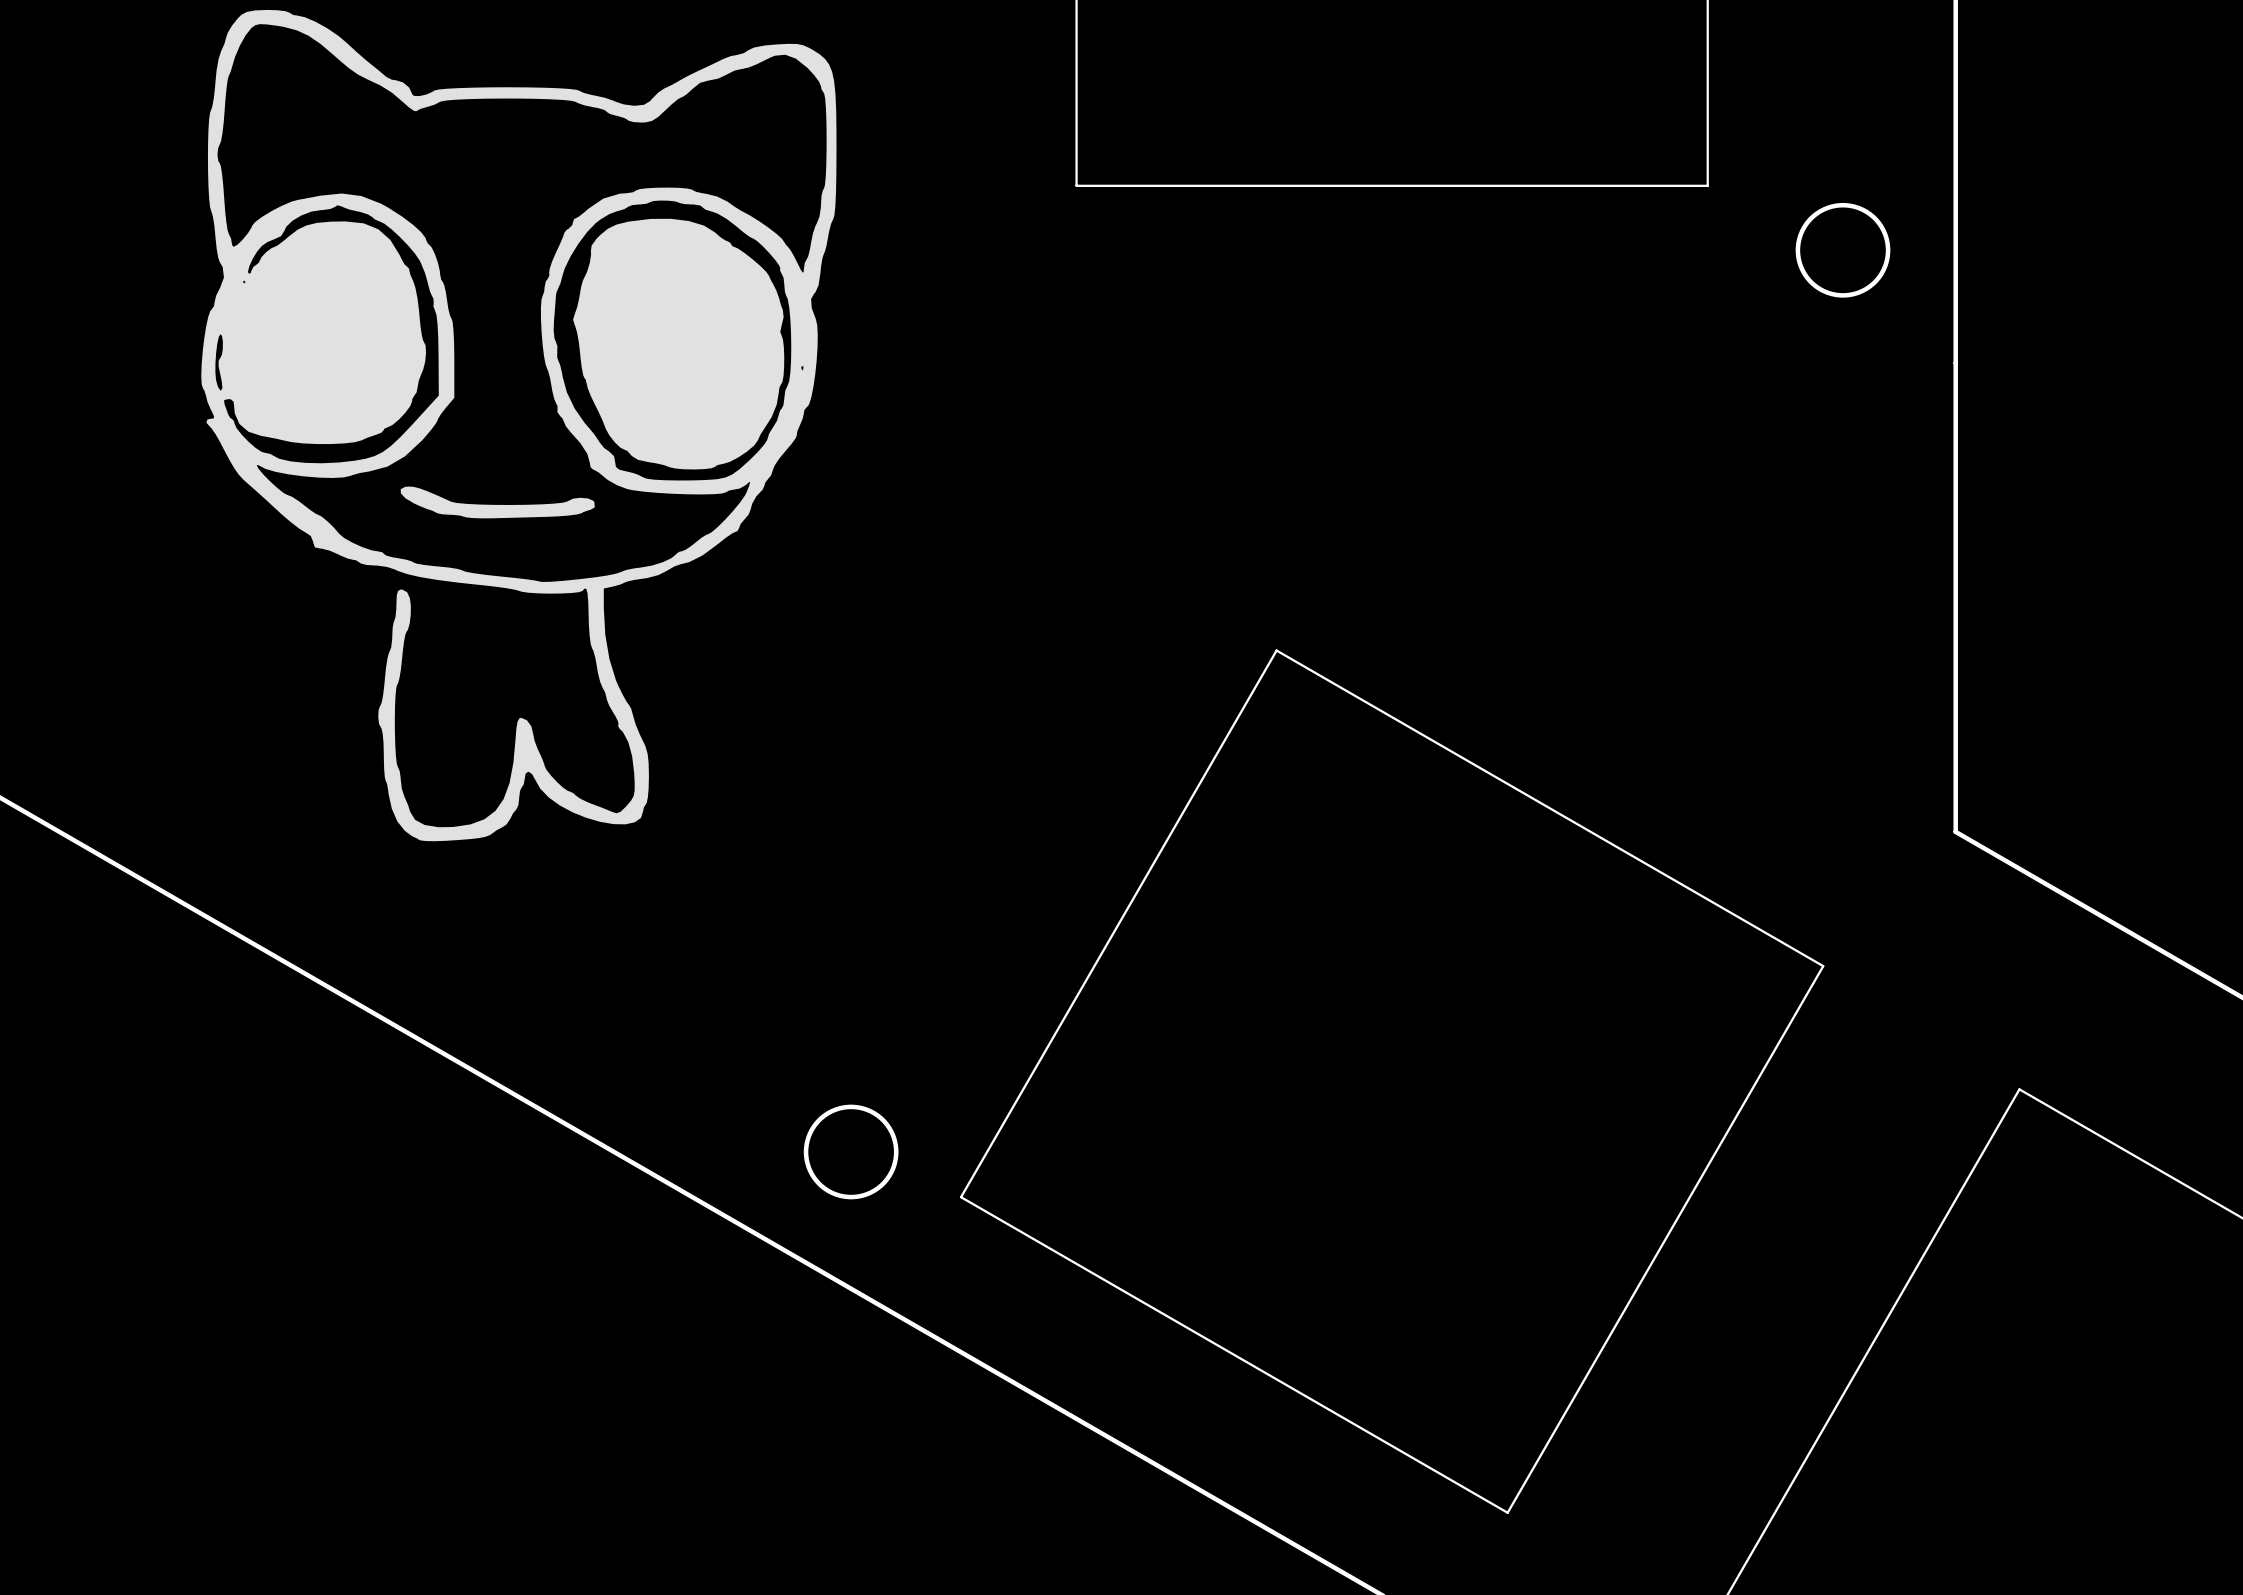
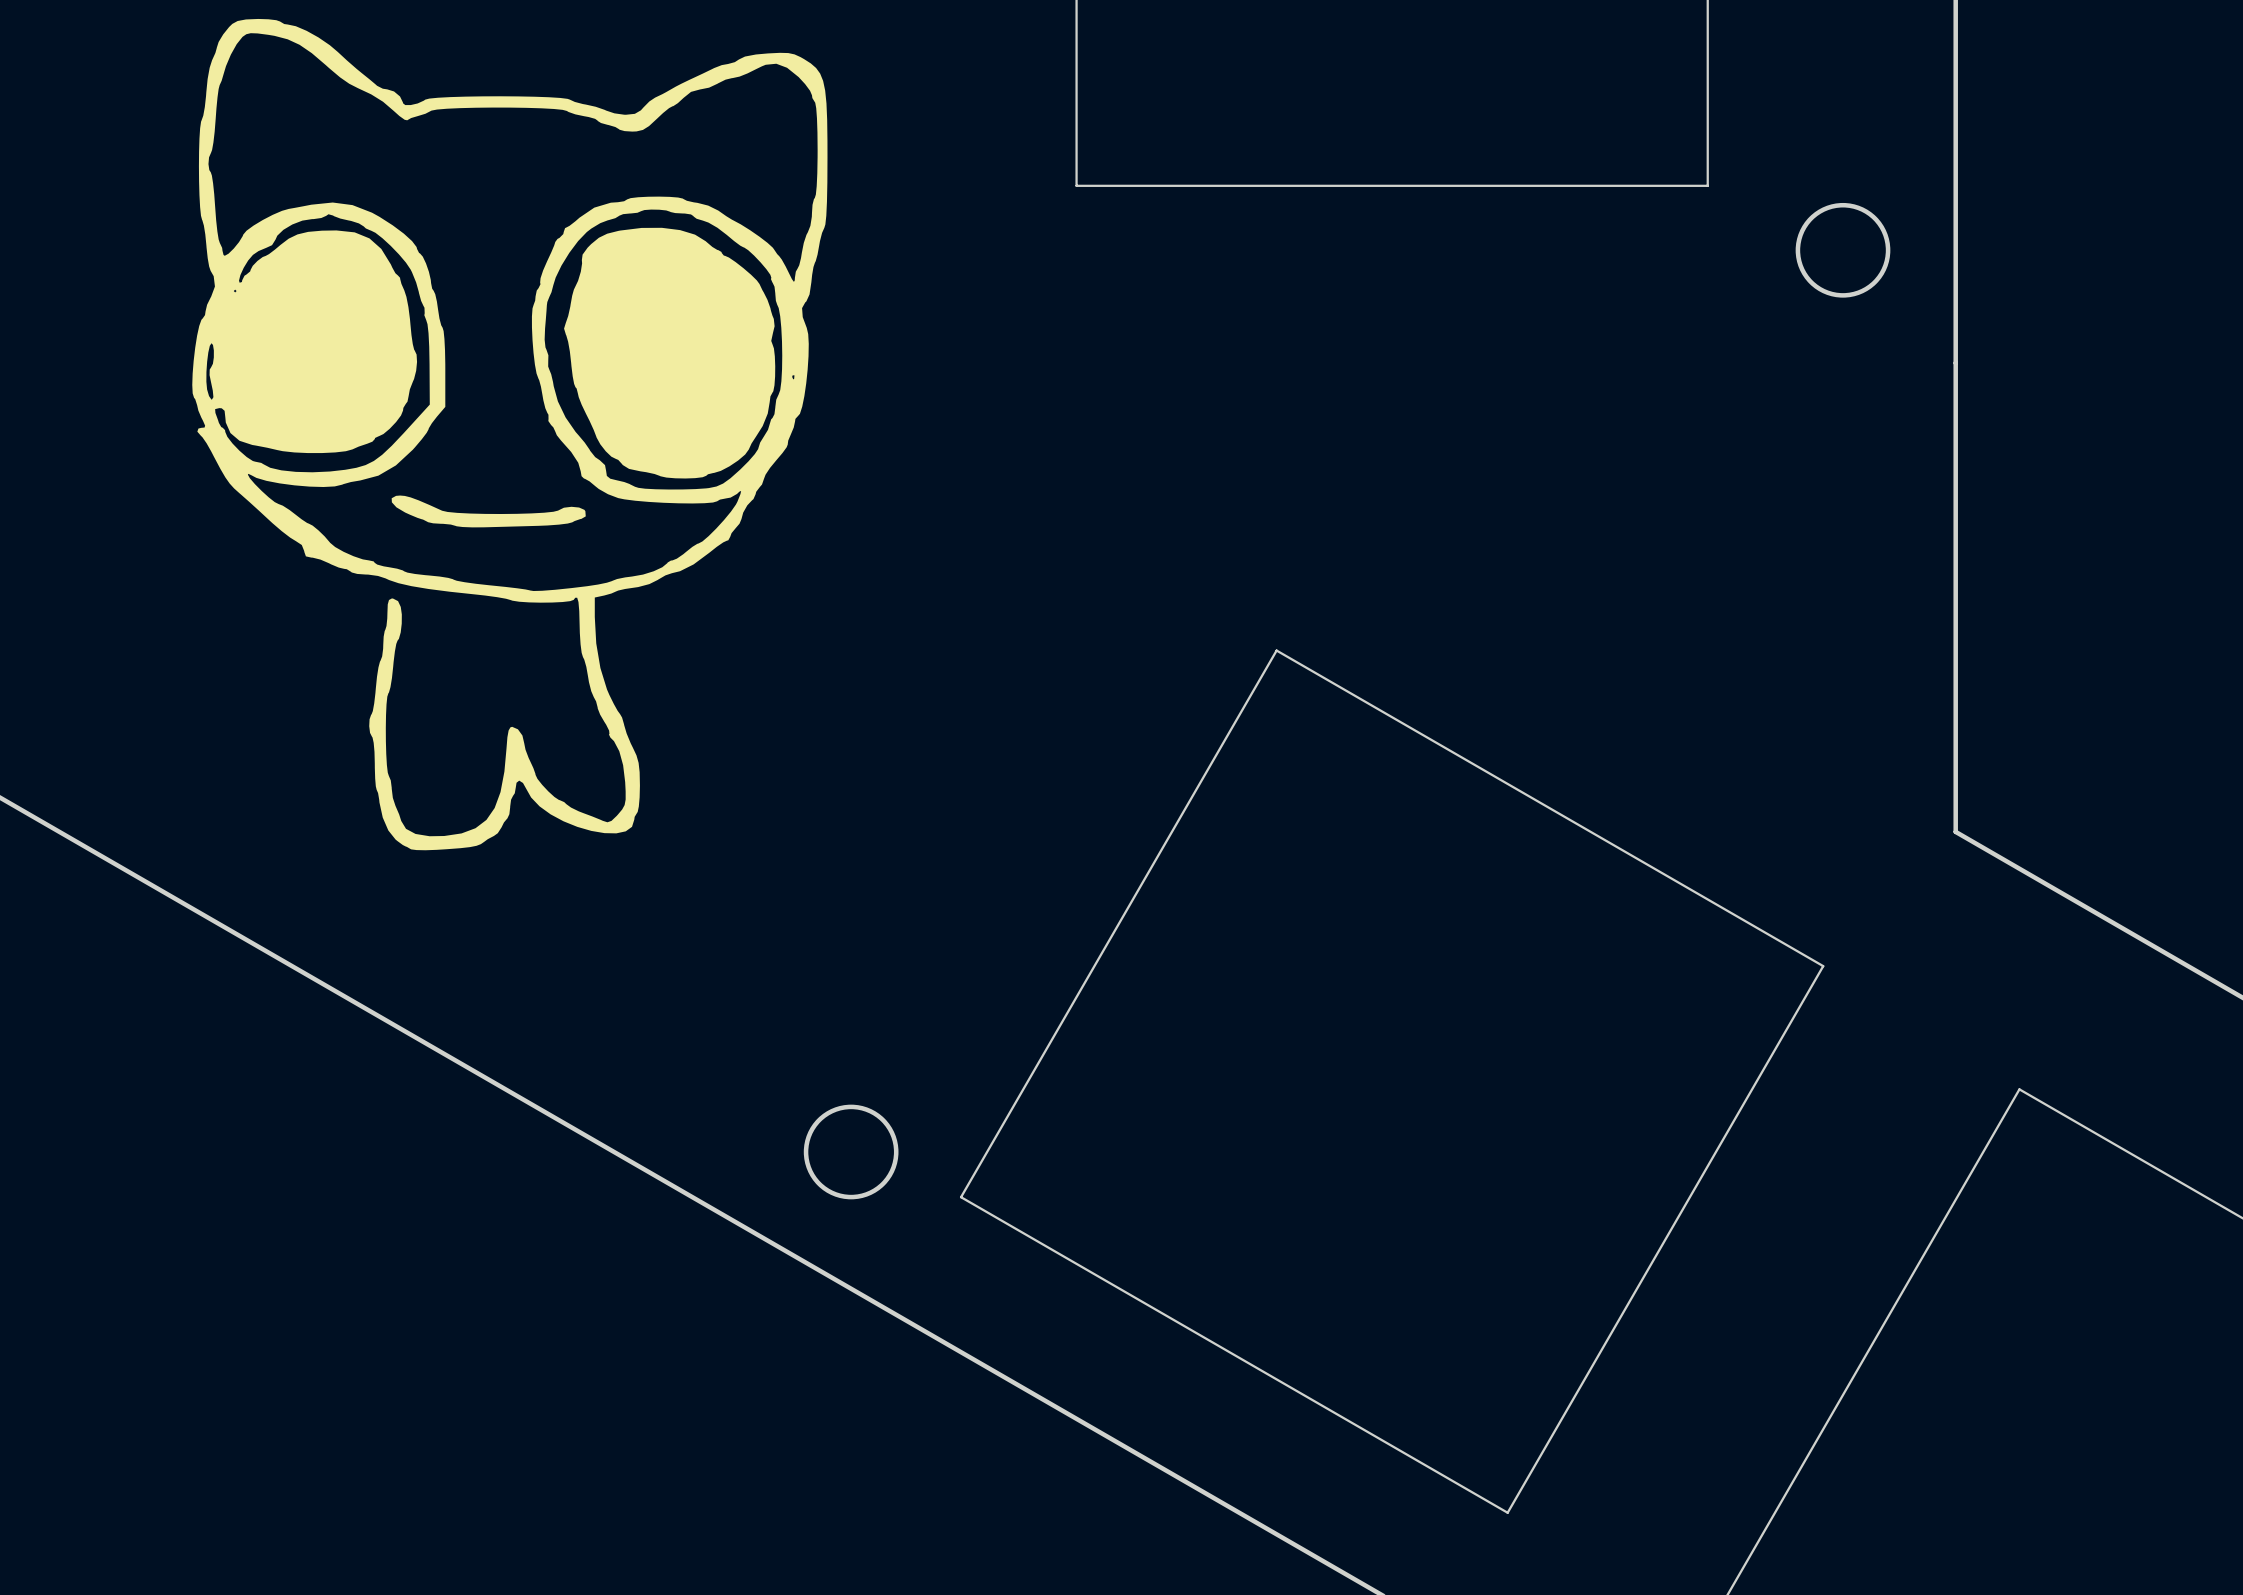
drawing position: (518, 425) -> (509, 434)

